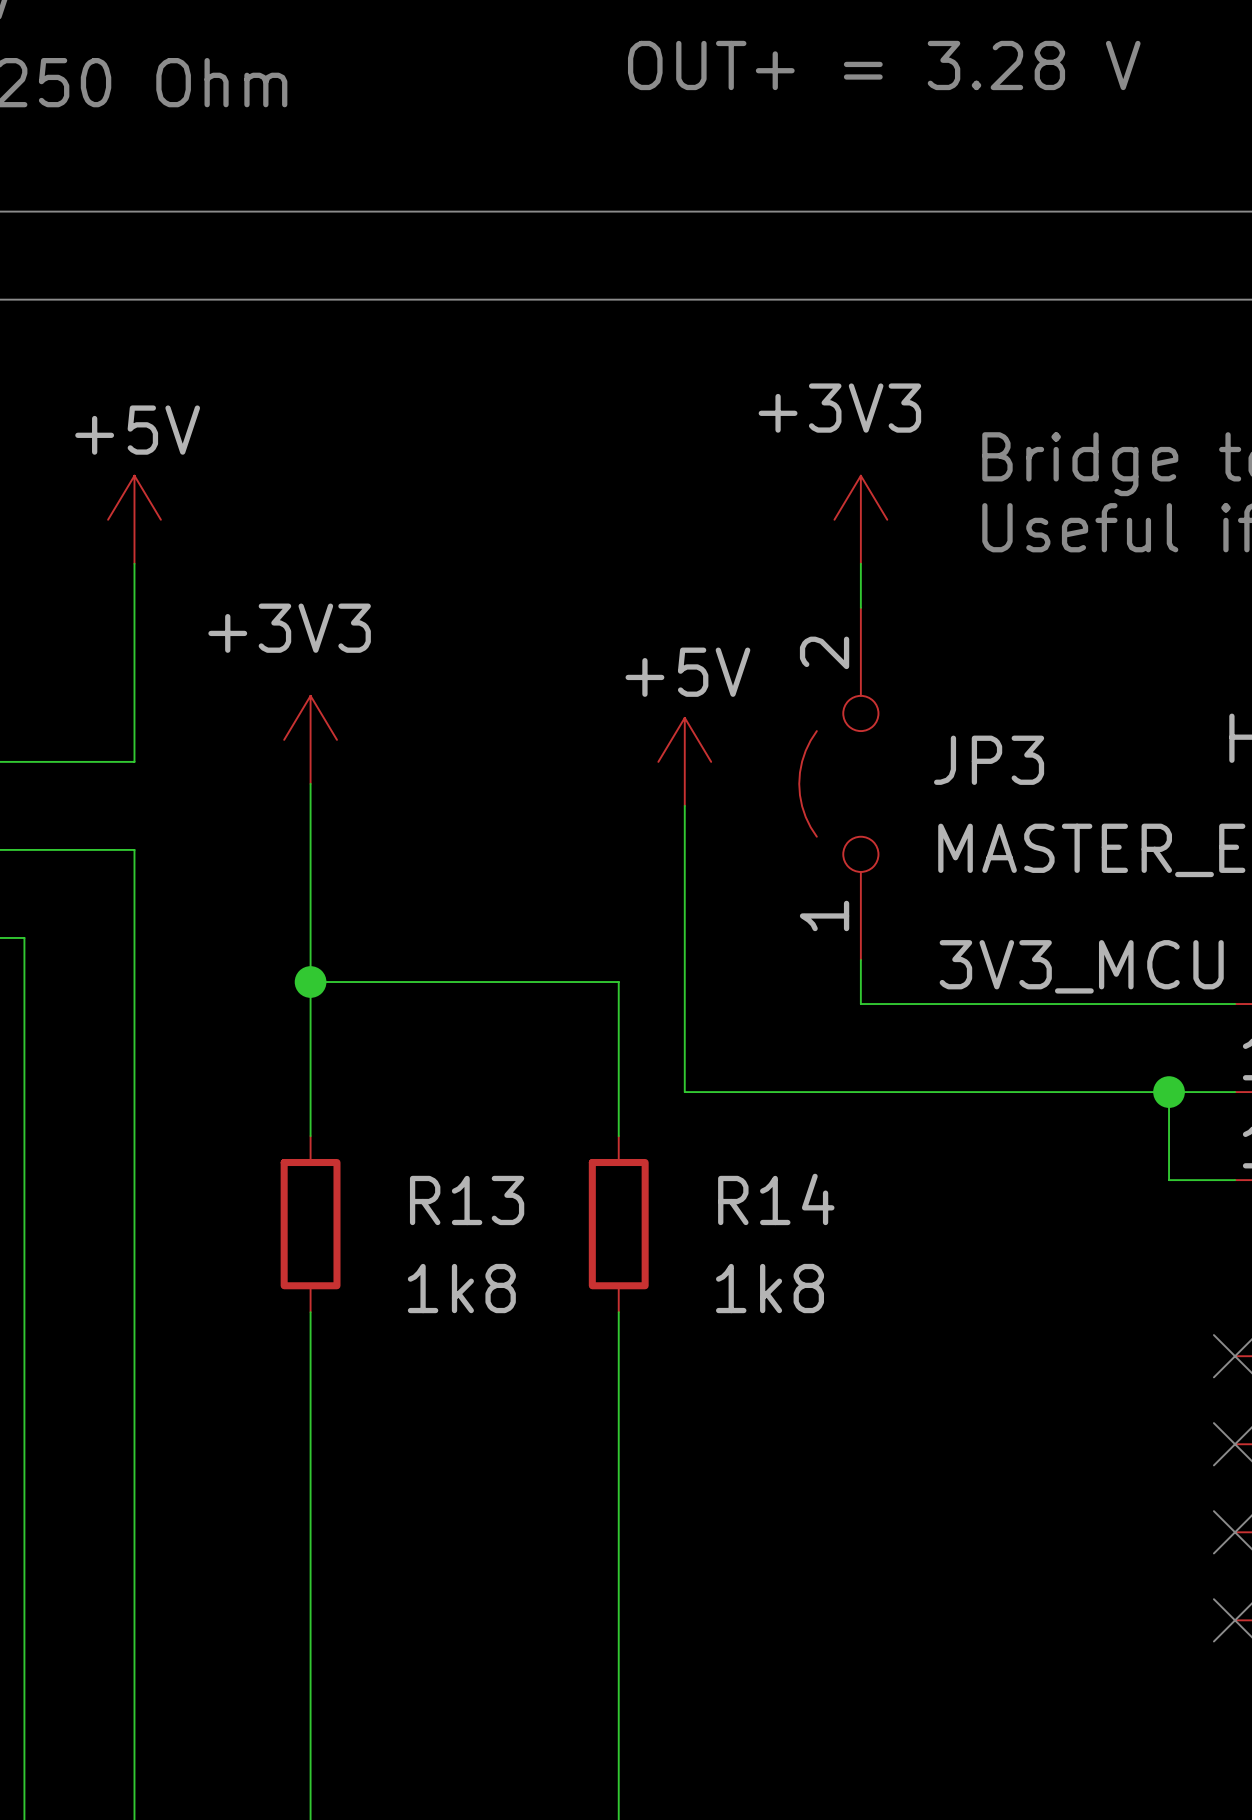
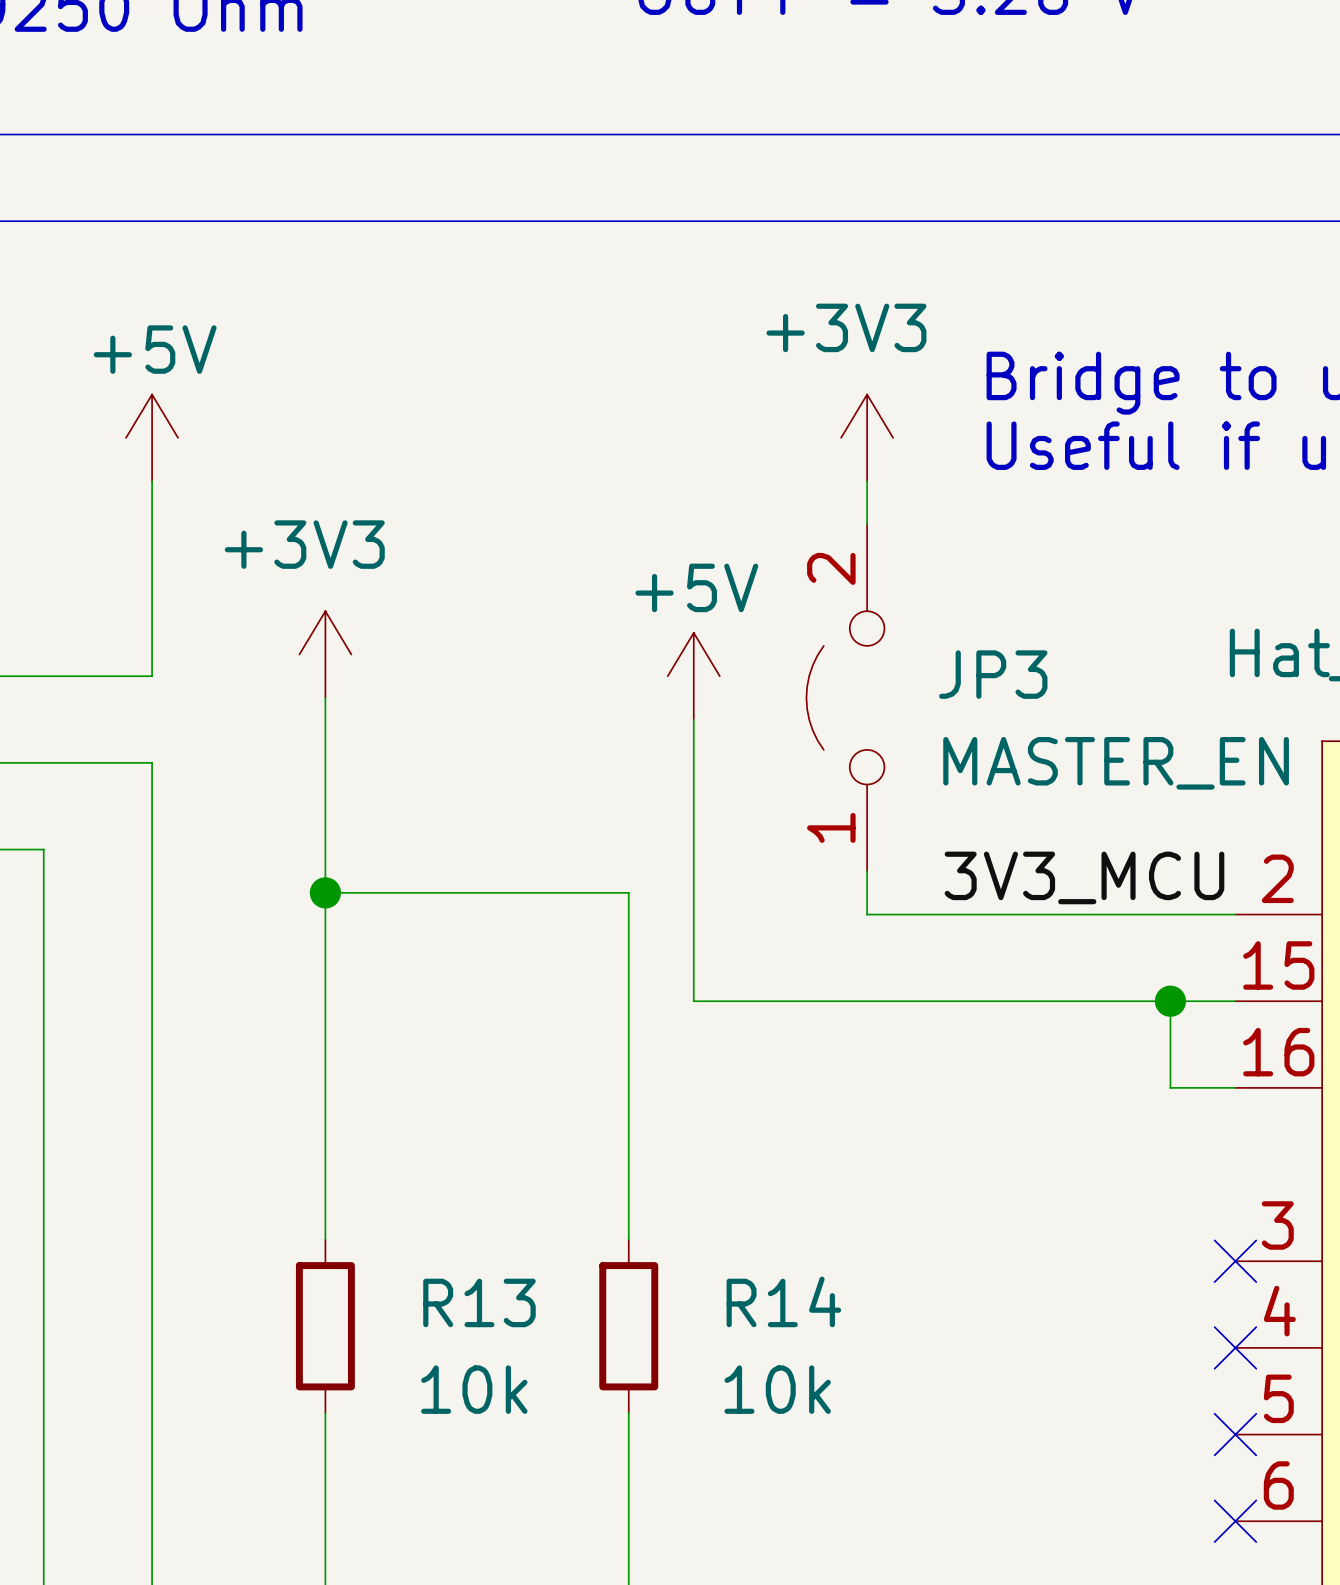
R13 position: (310, 1224) -> (325, 1326)
R14 position: (618, 1224) -> (628, 1326)
R13 value: 1k8 (461, 1288) -> 10k (474, 1389)
R14 value: 1k8 (770, 1288) -> 10k (777, 1389)
wire: (310, 1334) (310, 1510) -> (325, 1044) (325, 1217)
wire: (618, 1334) (618, 1510) -> (628, 1044) (628, 1217)

